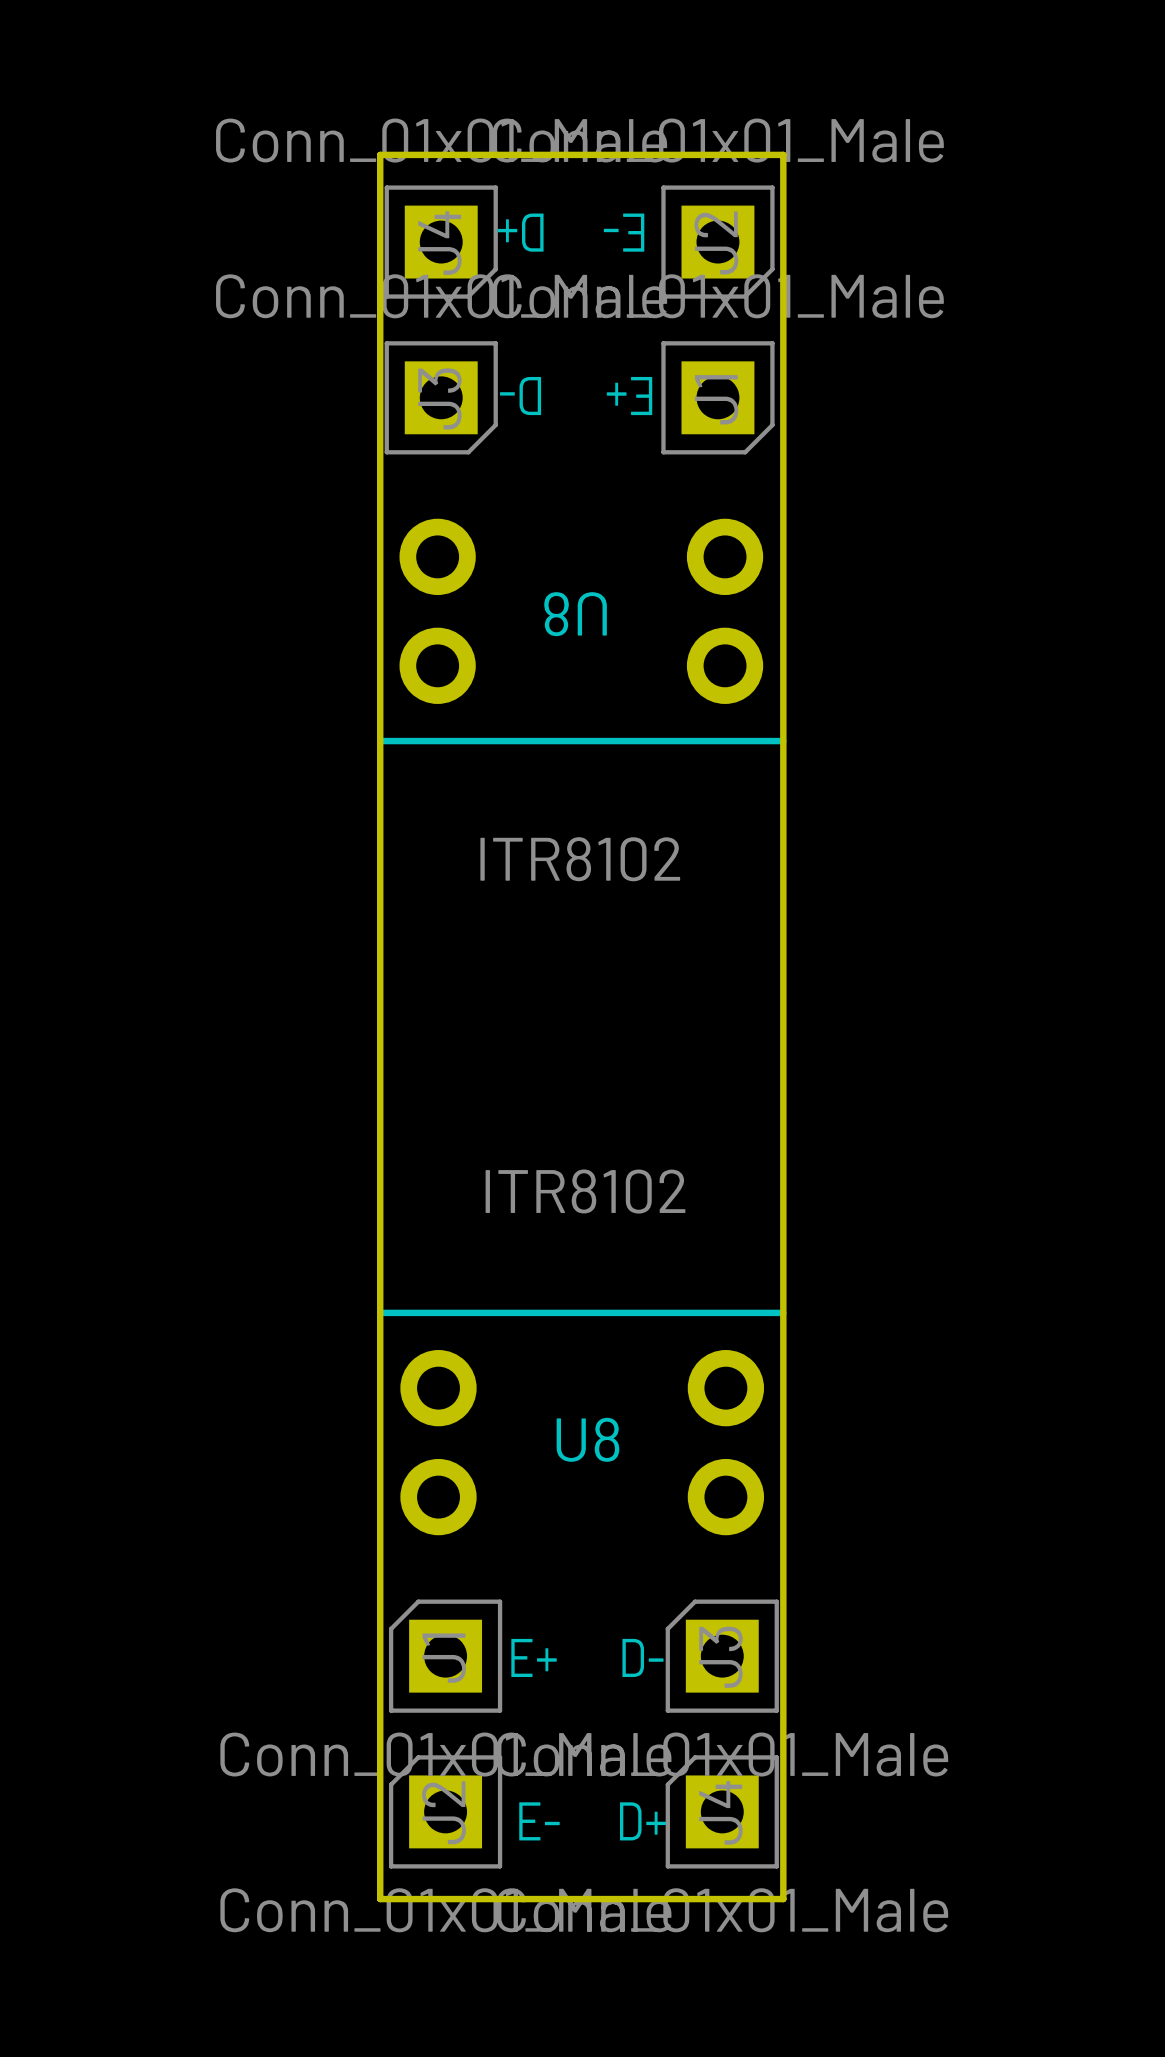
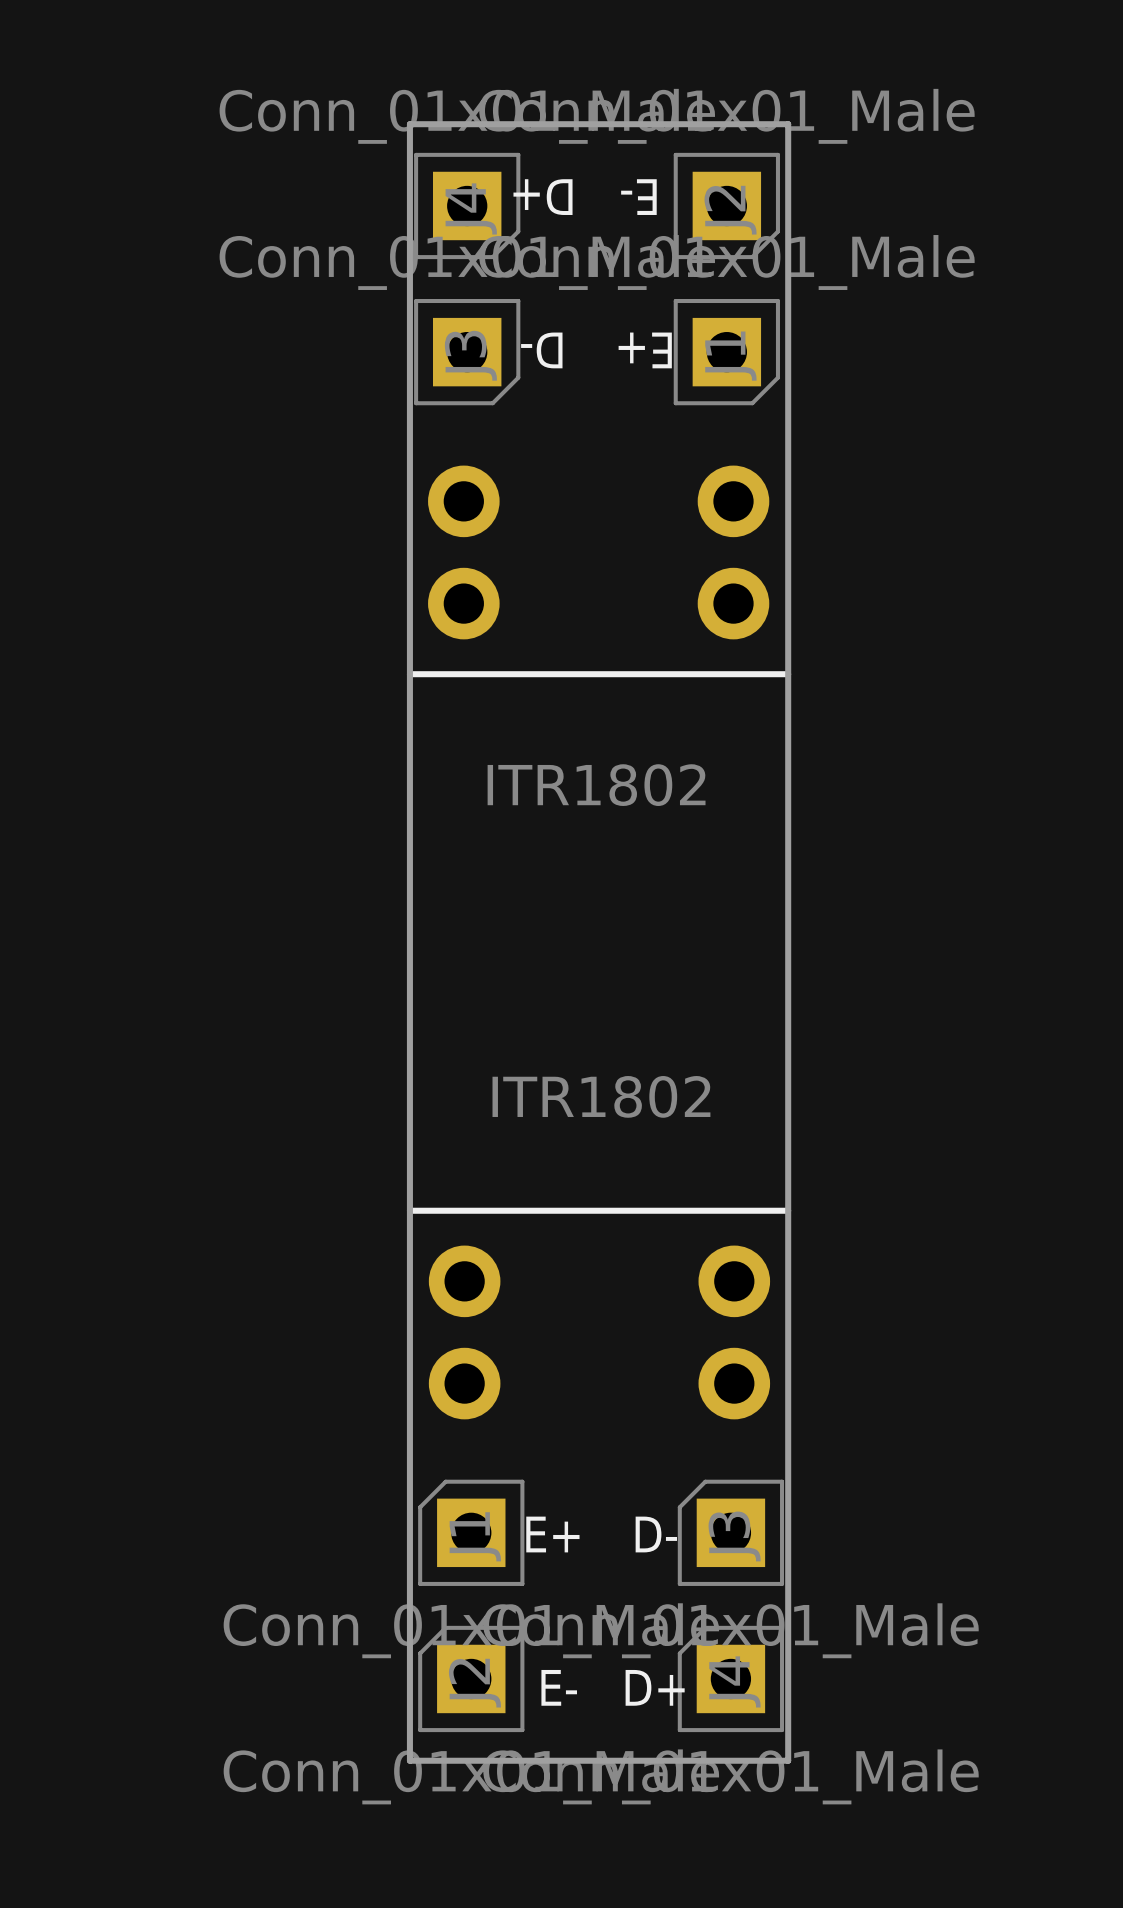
U8 name: U8 (575, 614) -> none
U8 value: ITR8102 (580, 859) -> ITR1802 (596, 785)
U8 value: ITR8102 (585, 1191) -> ITR1802 (601, 1096)
U8 name: U8 (587, 1439) -> none

